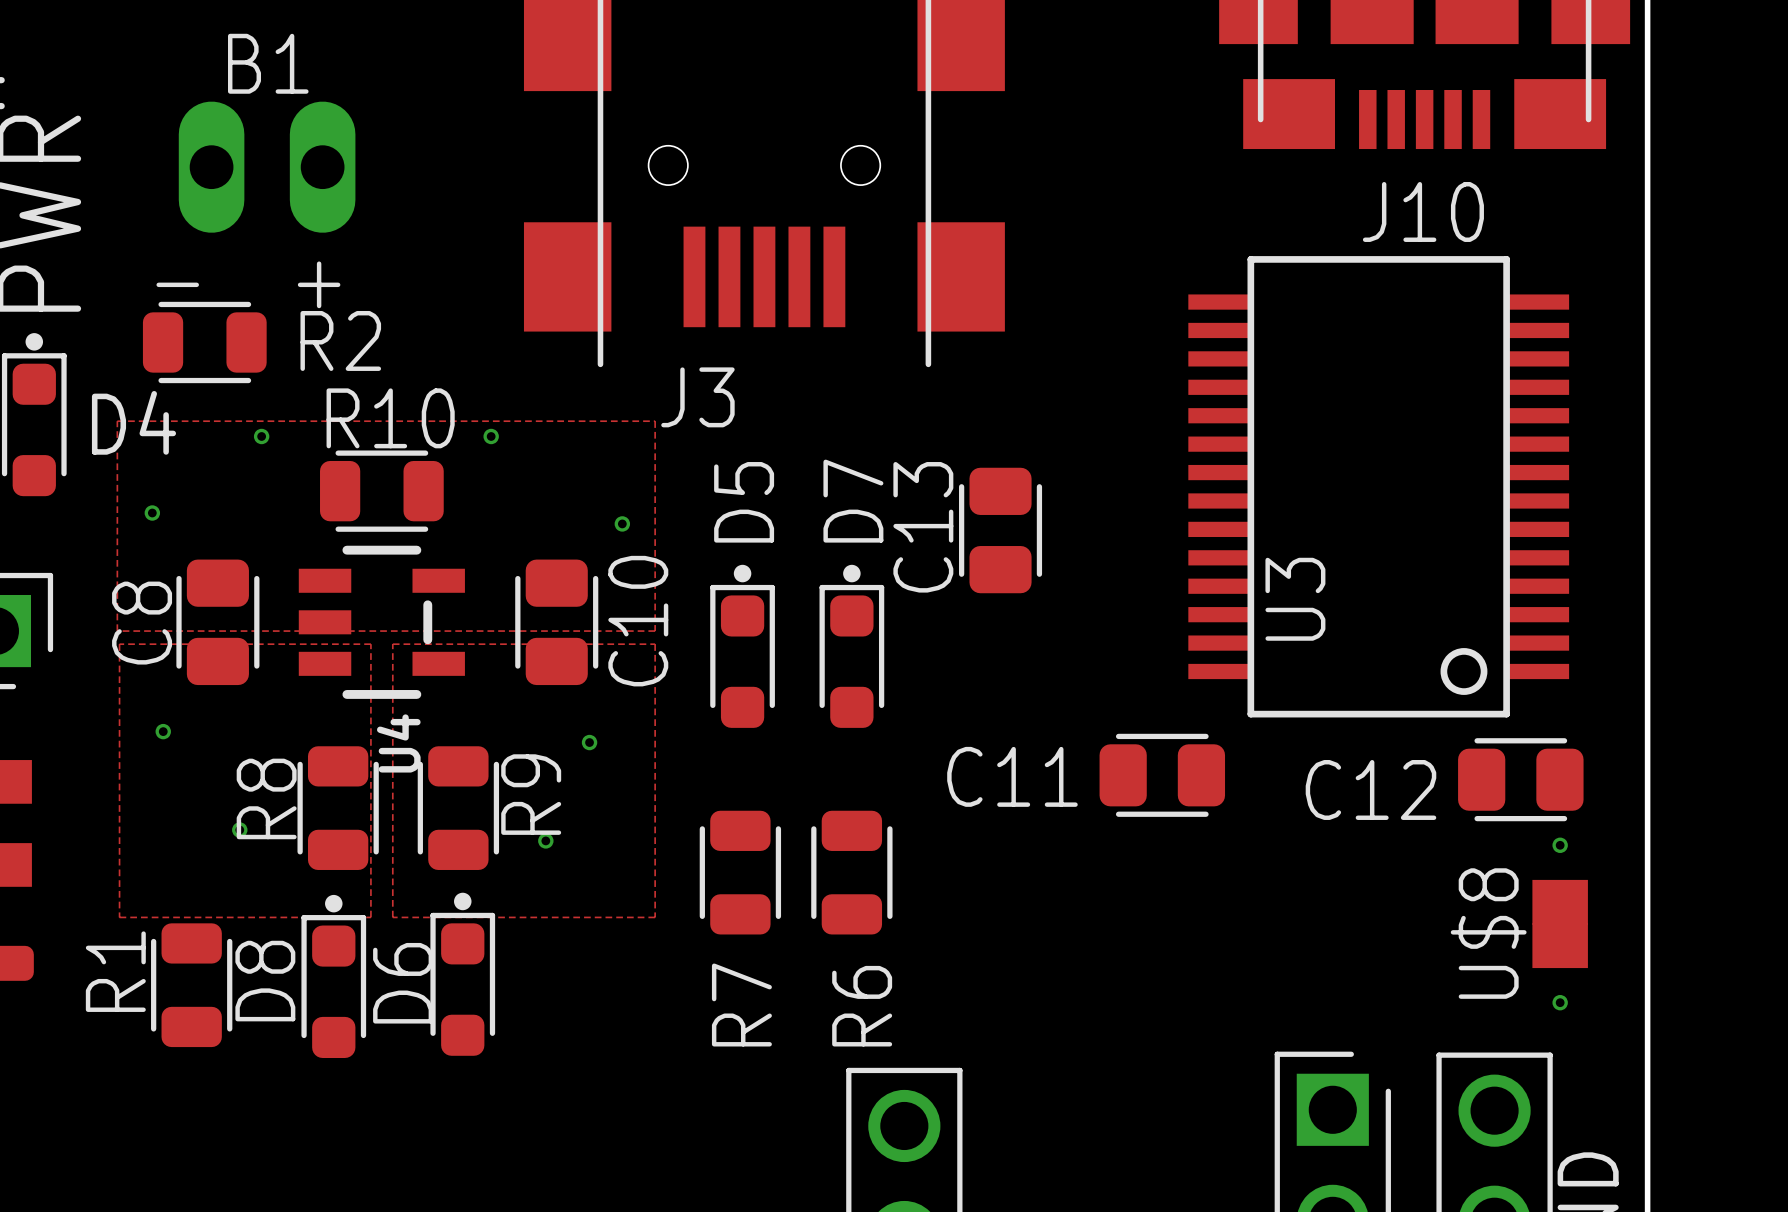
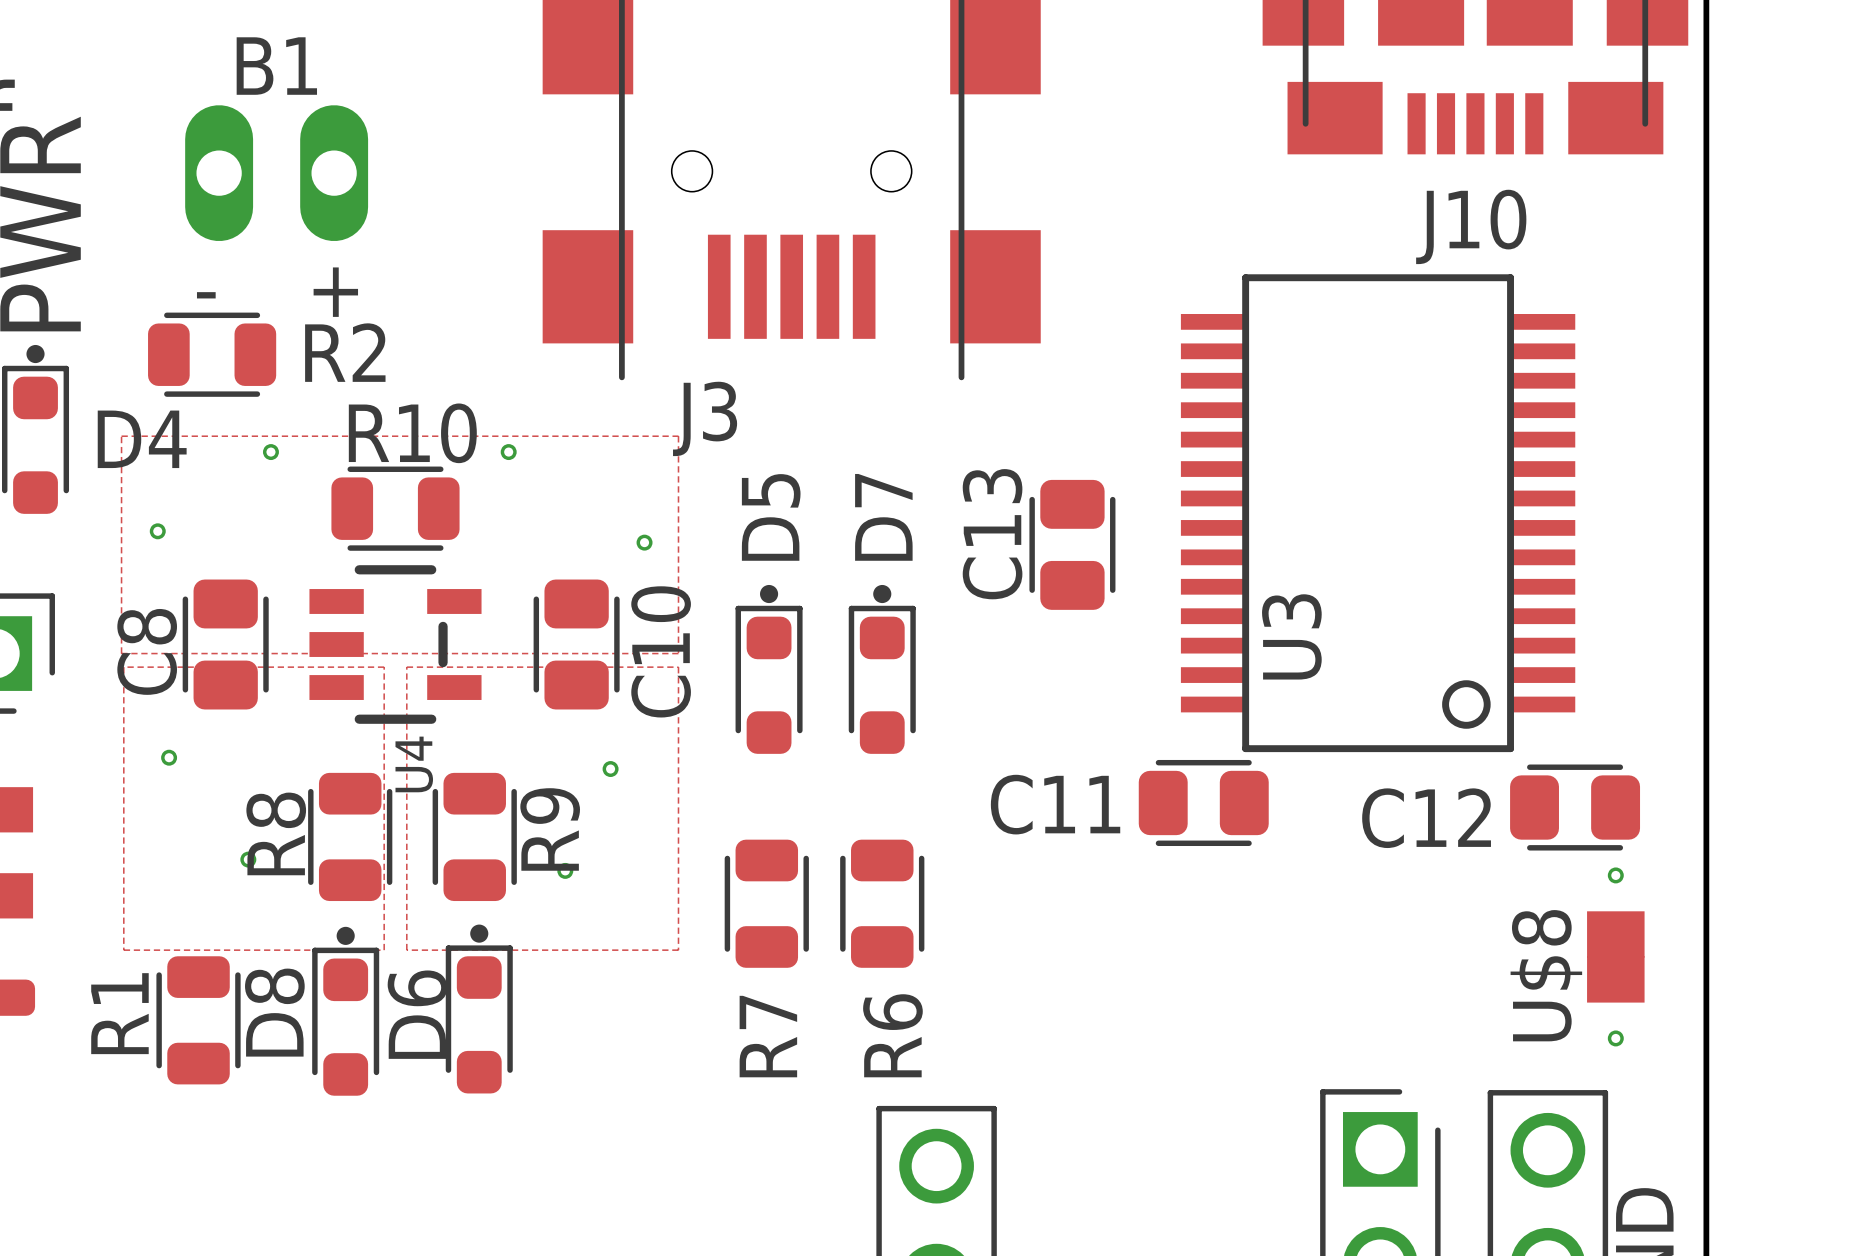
U3 position: (1378, 486) -> (1378, 513)
C13 position: (1000, 530) -> (1072, 544)

